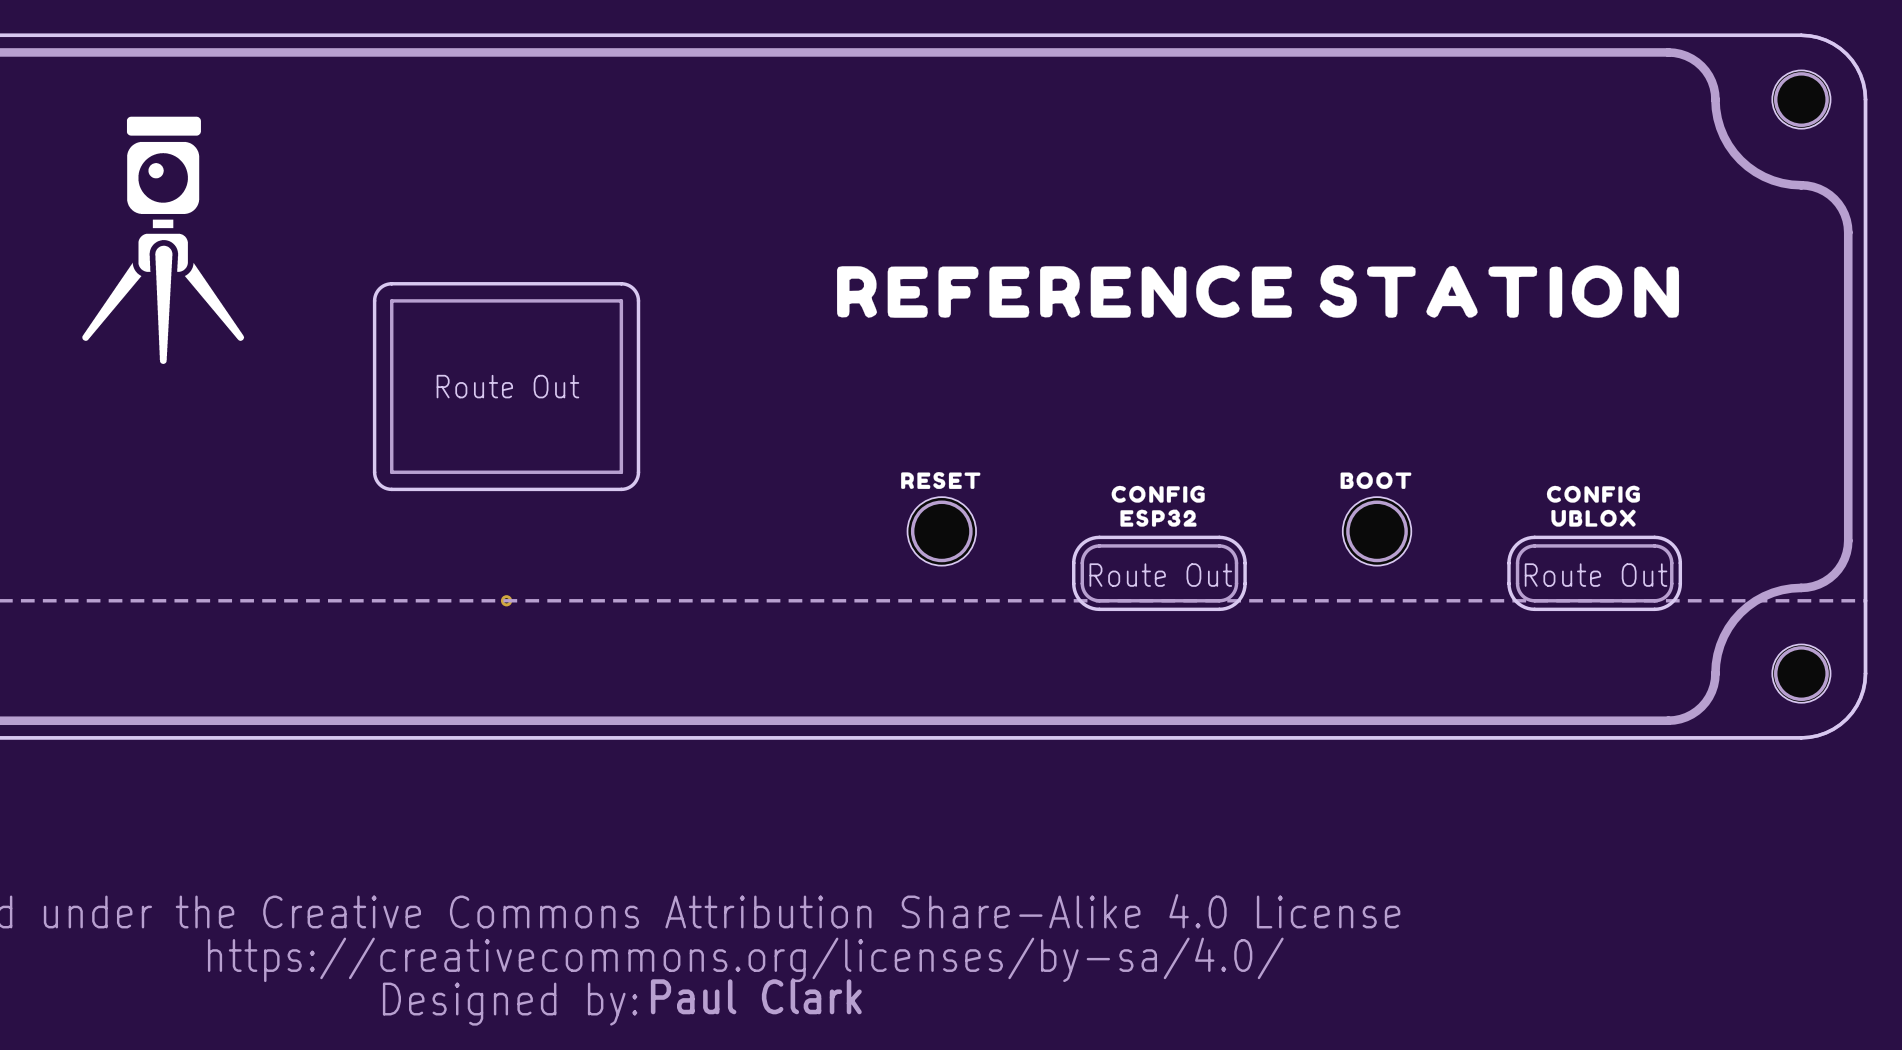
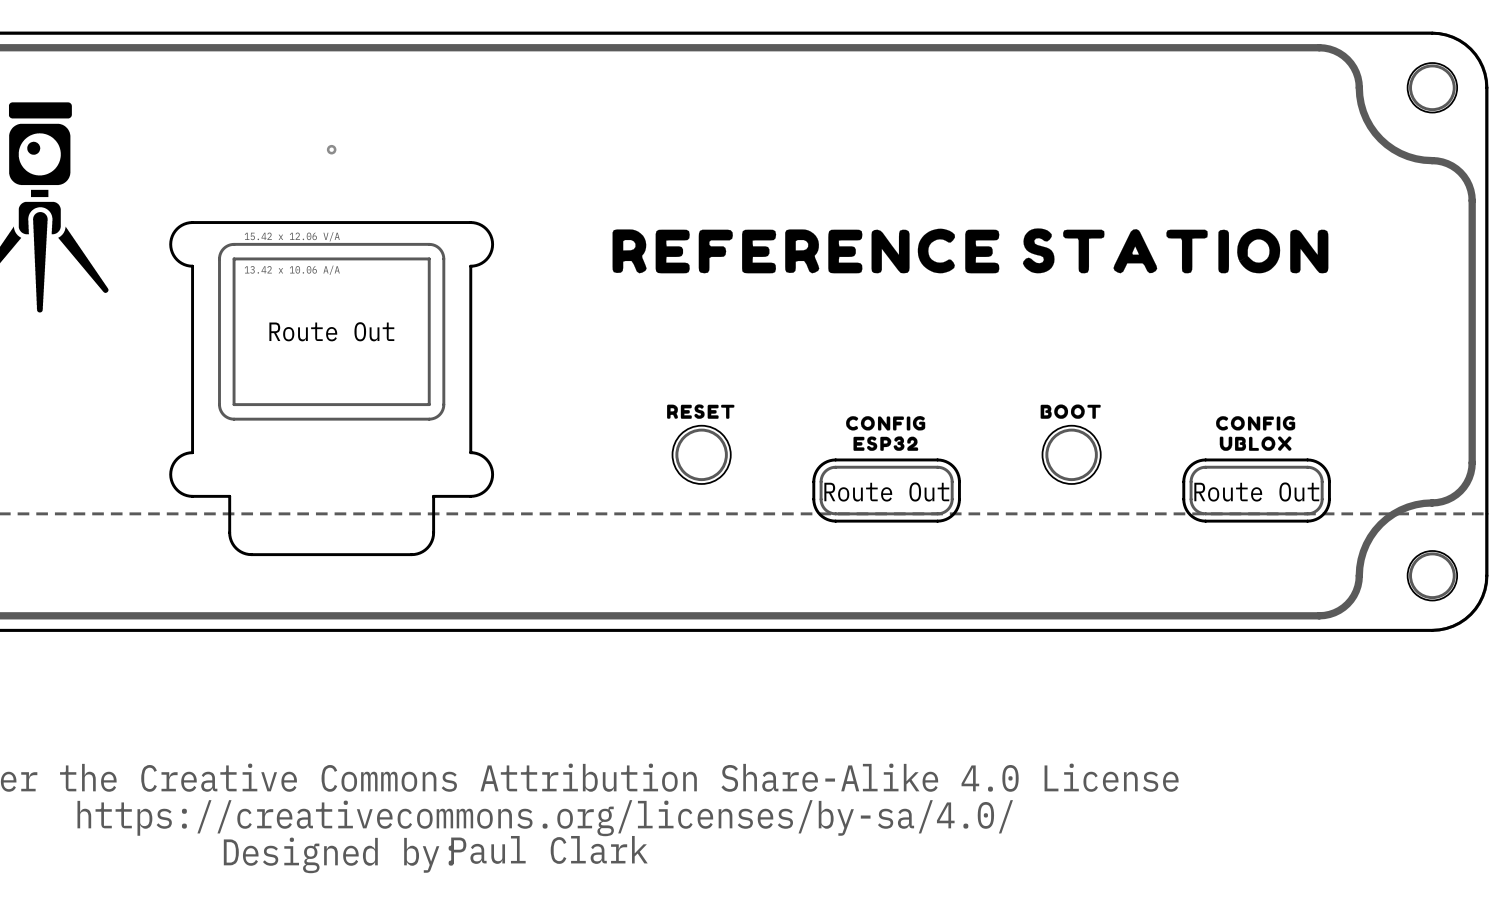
via: none -> (331, 149)
drawing: none -> [169, 221, 495, 557]
drawing: [372, 282, 641, 492] -> none
via: (506, 600) -> none

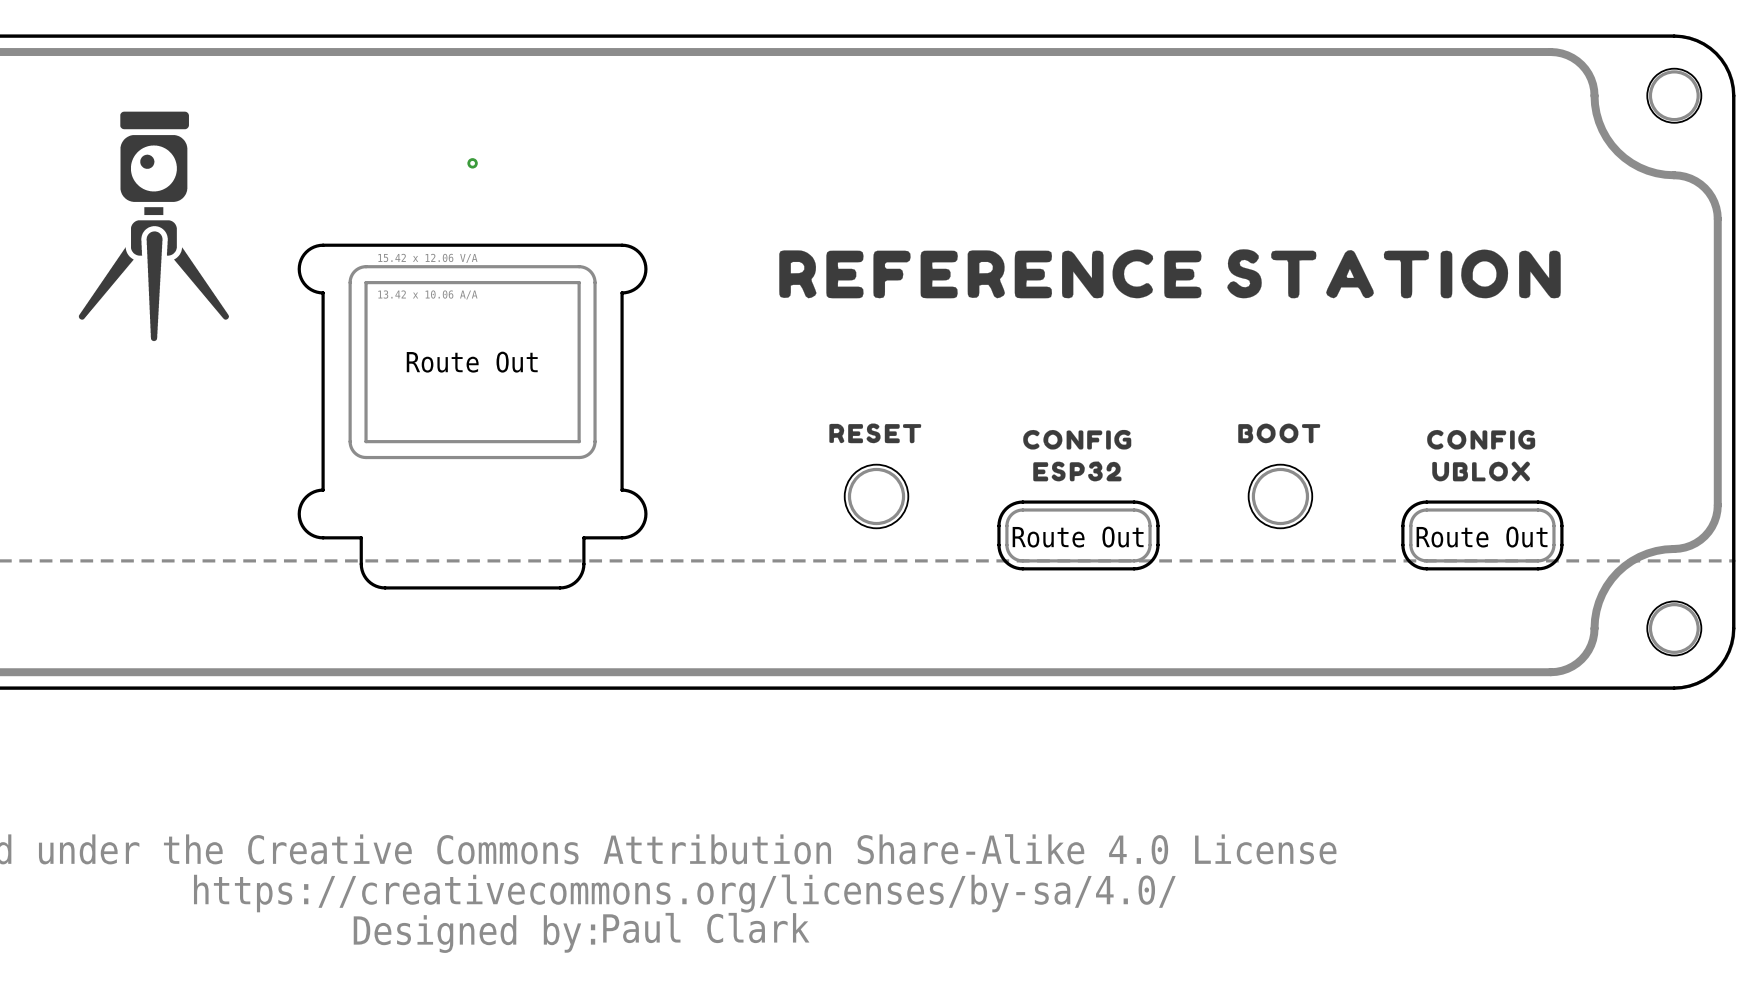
drawing shape: [169, 221, 495, 557] -> [297, 243, 648, 590]
drawing: none -> [829, 423, 922, 444]
drawing: none -> [1238, 423, 1321, 444]
drawing: none -> [1023, 429, 1132, 482]
drawing: none -> [1427, 429, 1536, 482]
drawing: [667, 404, 735, 419] -> none
drawing: [1040, 404, 1101, 419] -> none
drawing: [846, 416, 926, 451] -> none
drawing: [1216, 416, 1296, 451] -> none

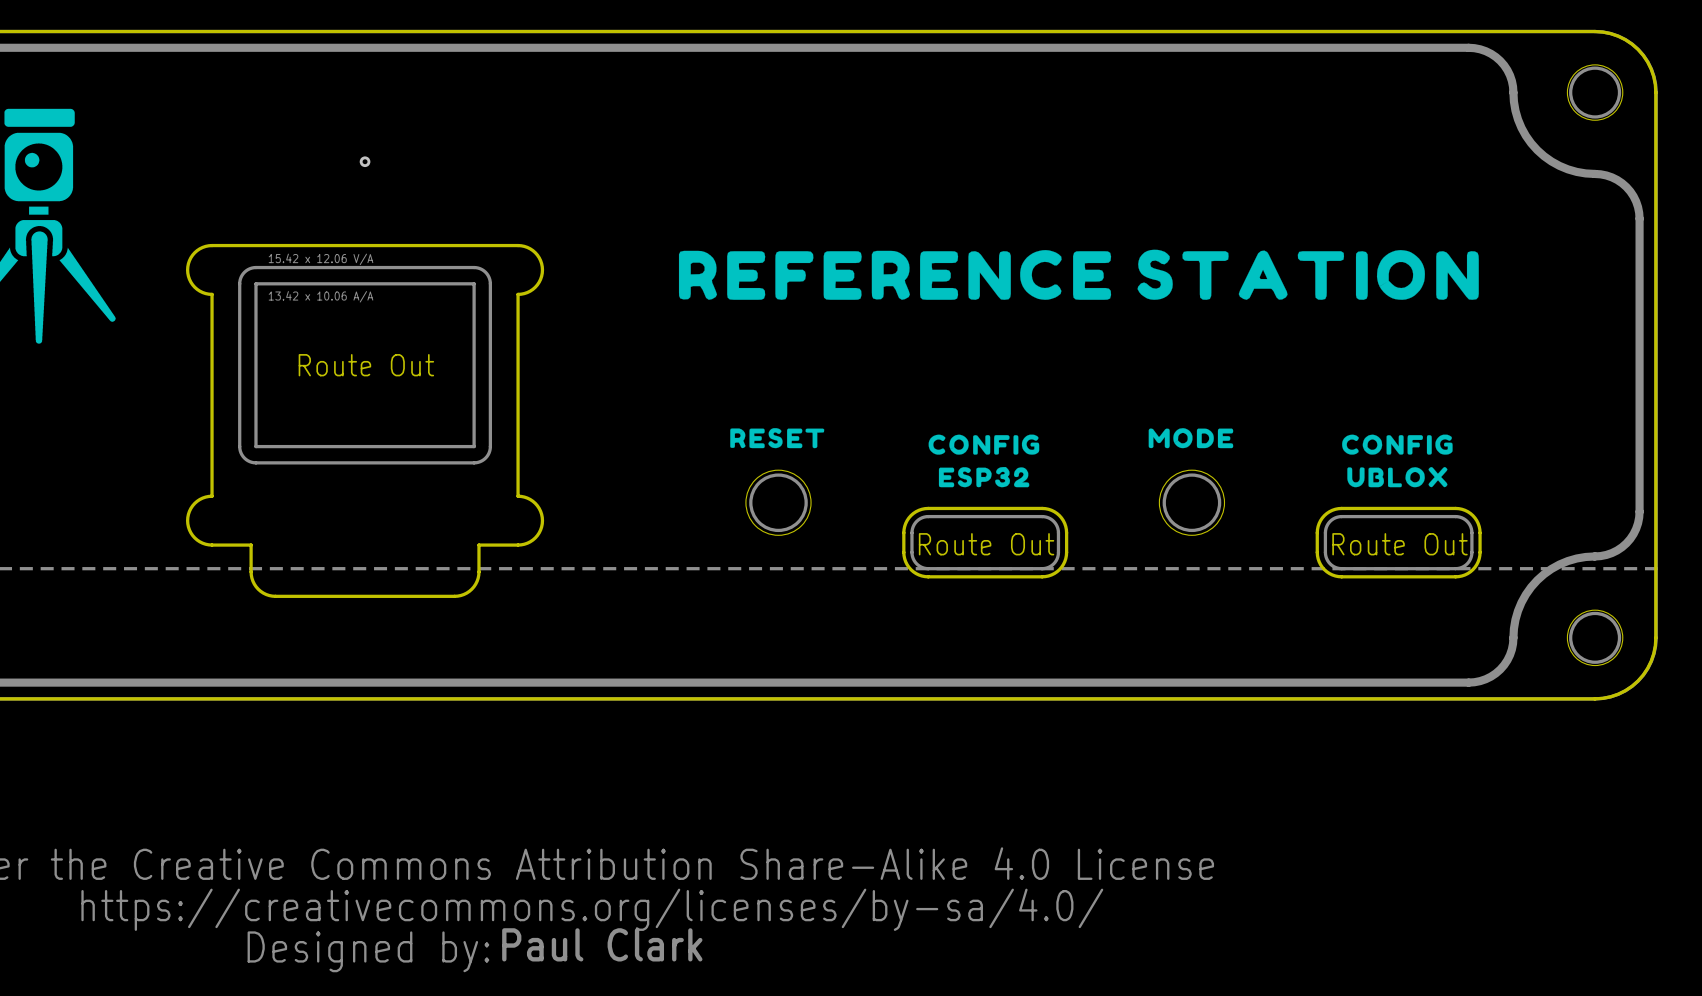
drawing shape: [1238, 423, 1321, 444] -> [1148, 428, 1234, 449]

